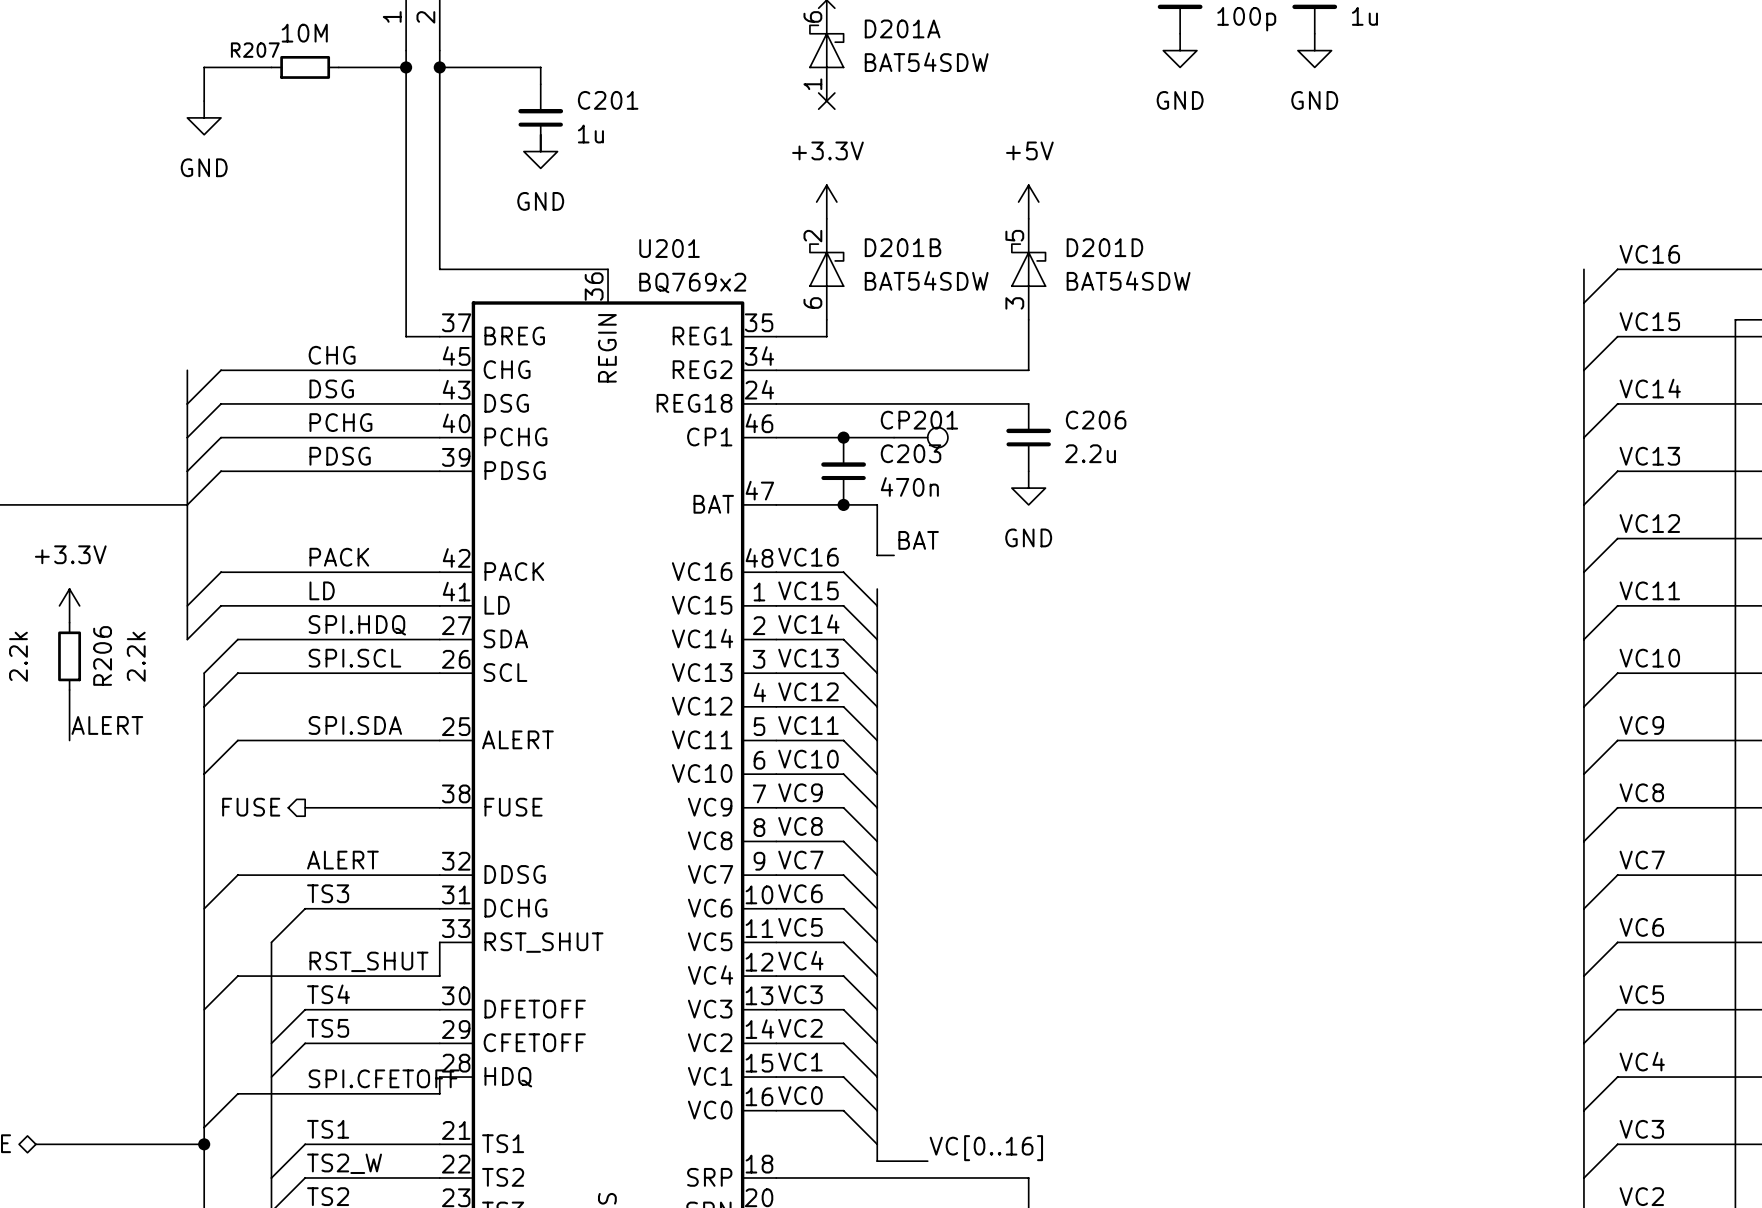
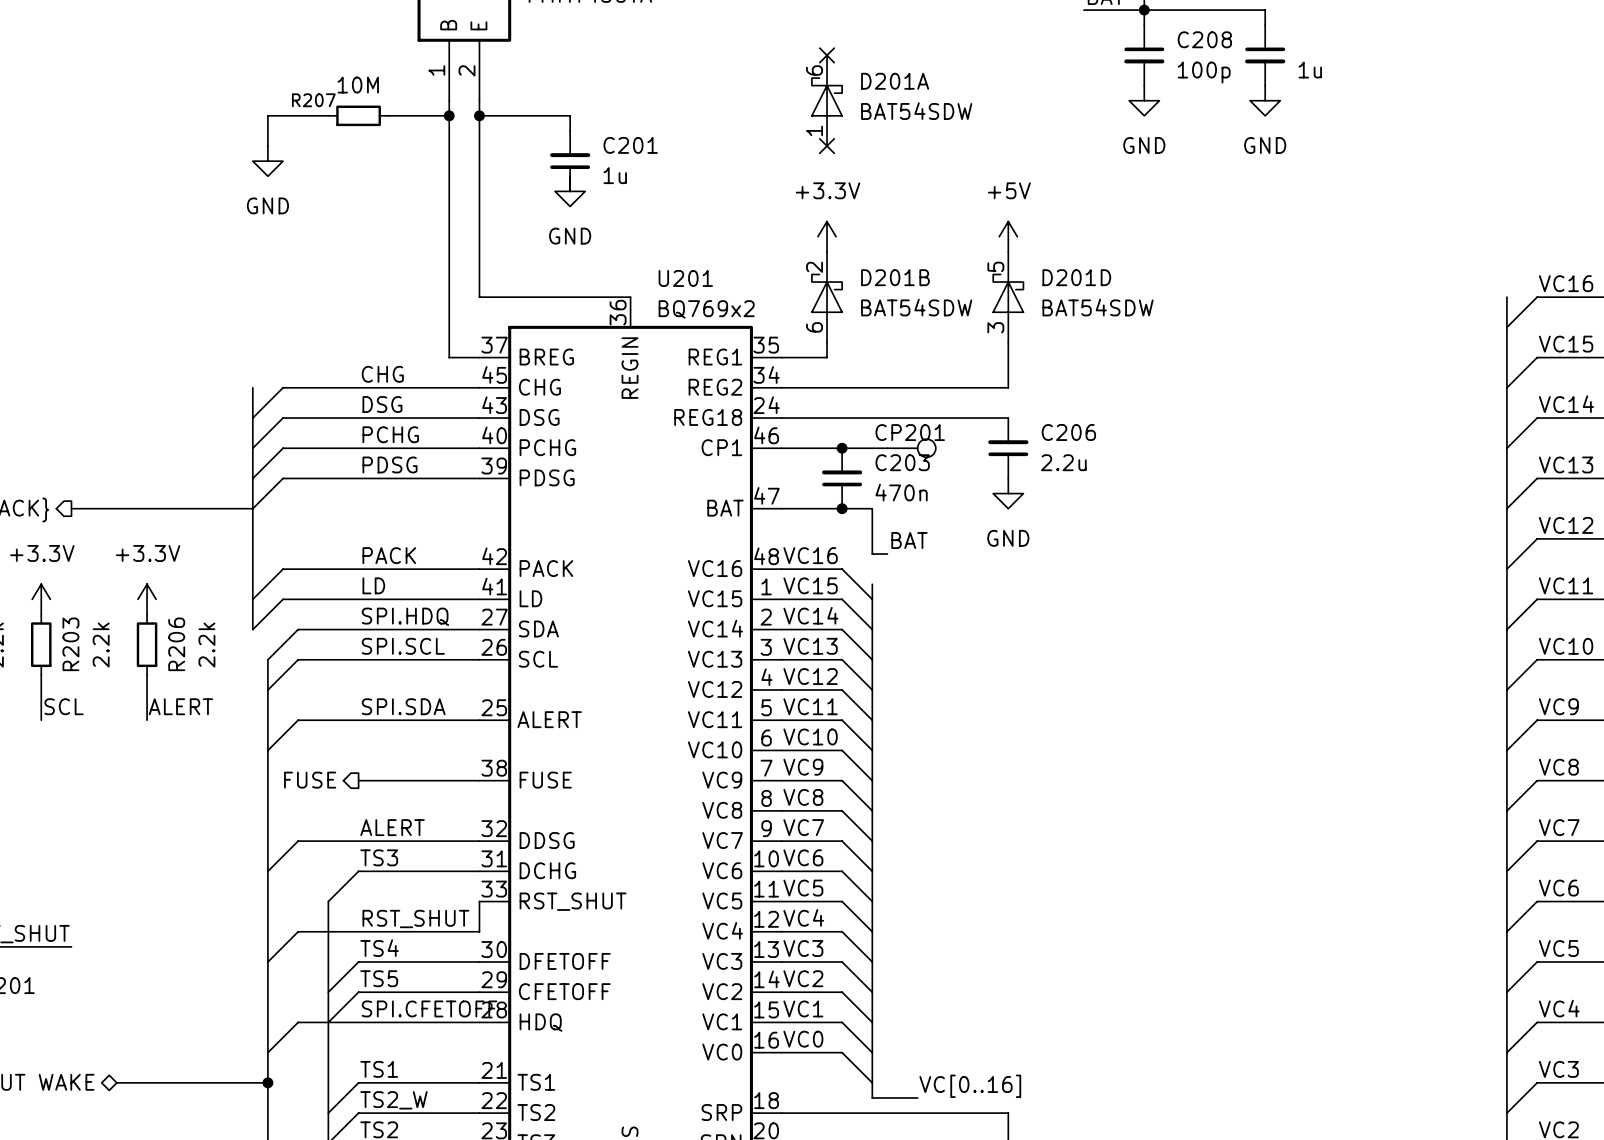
wire: (439, 1077) (439, 1093) (237, 1093) (204, 1127) -> (479, 1022) (298, 1022) (267, 1052)
label position: SPI.CFETOFF (384, 1078) -> SPI.CFETOFF (429, 1008)

